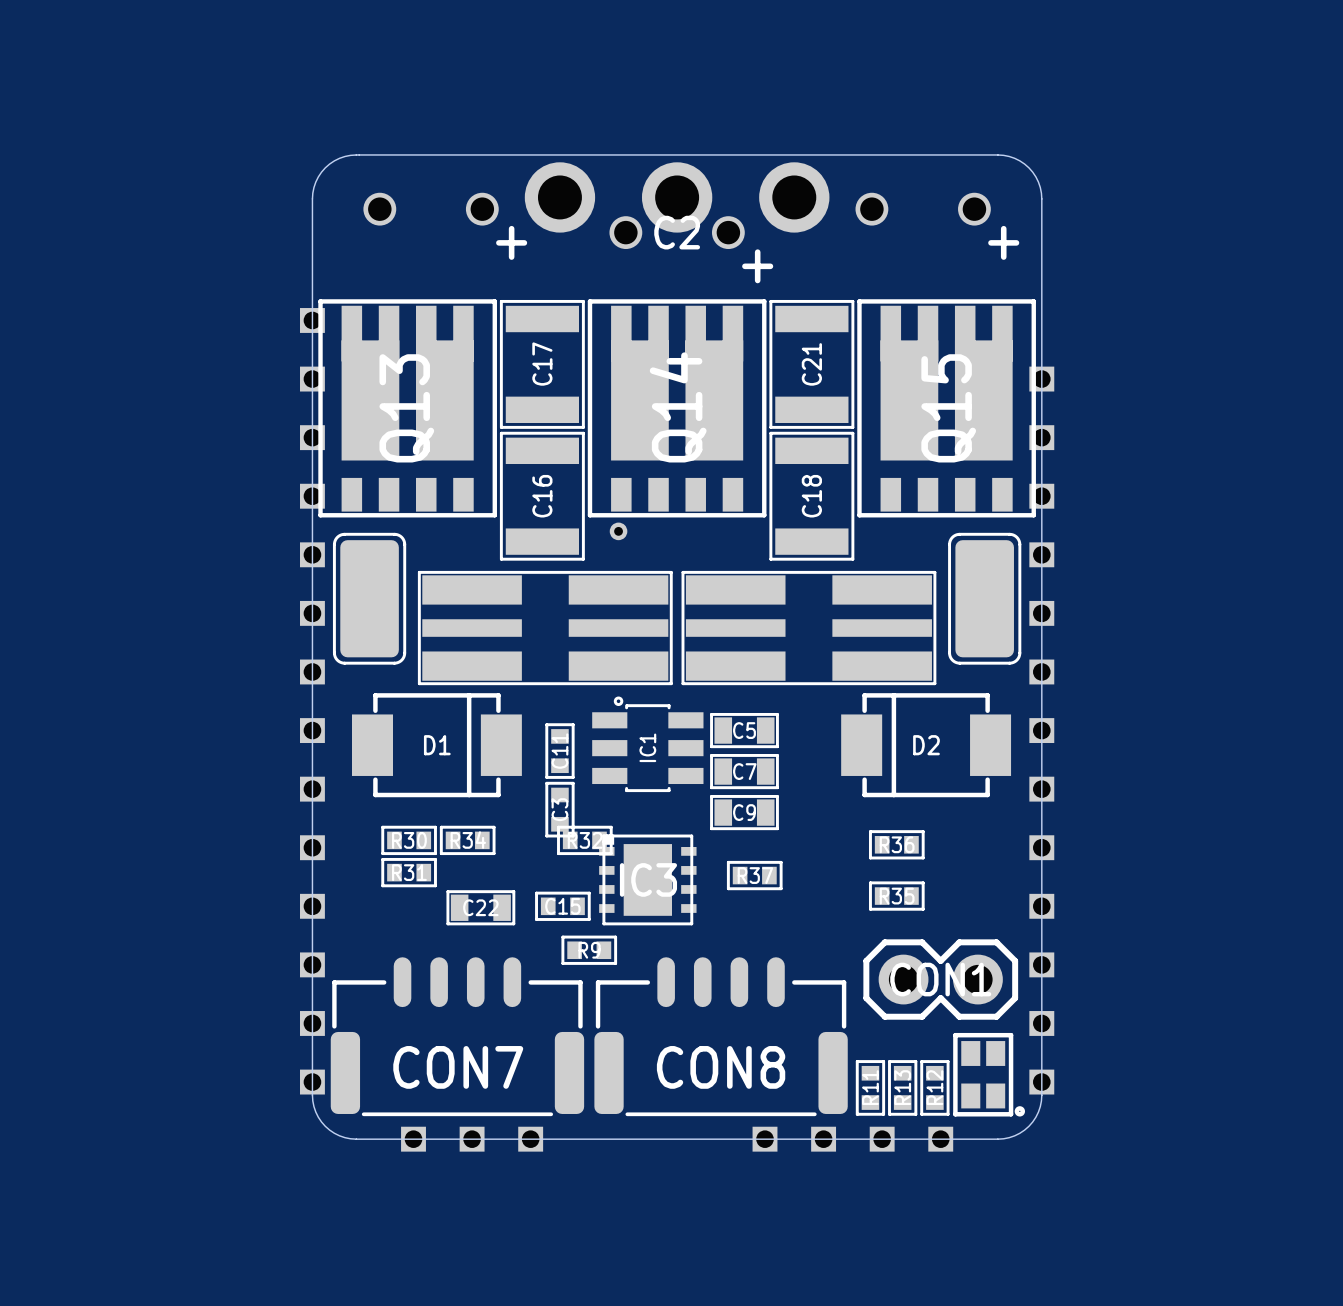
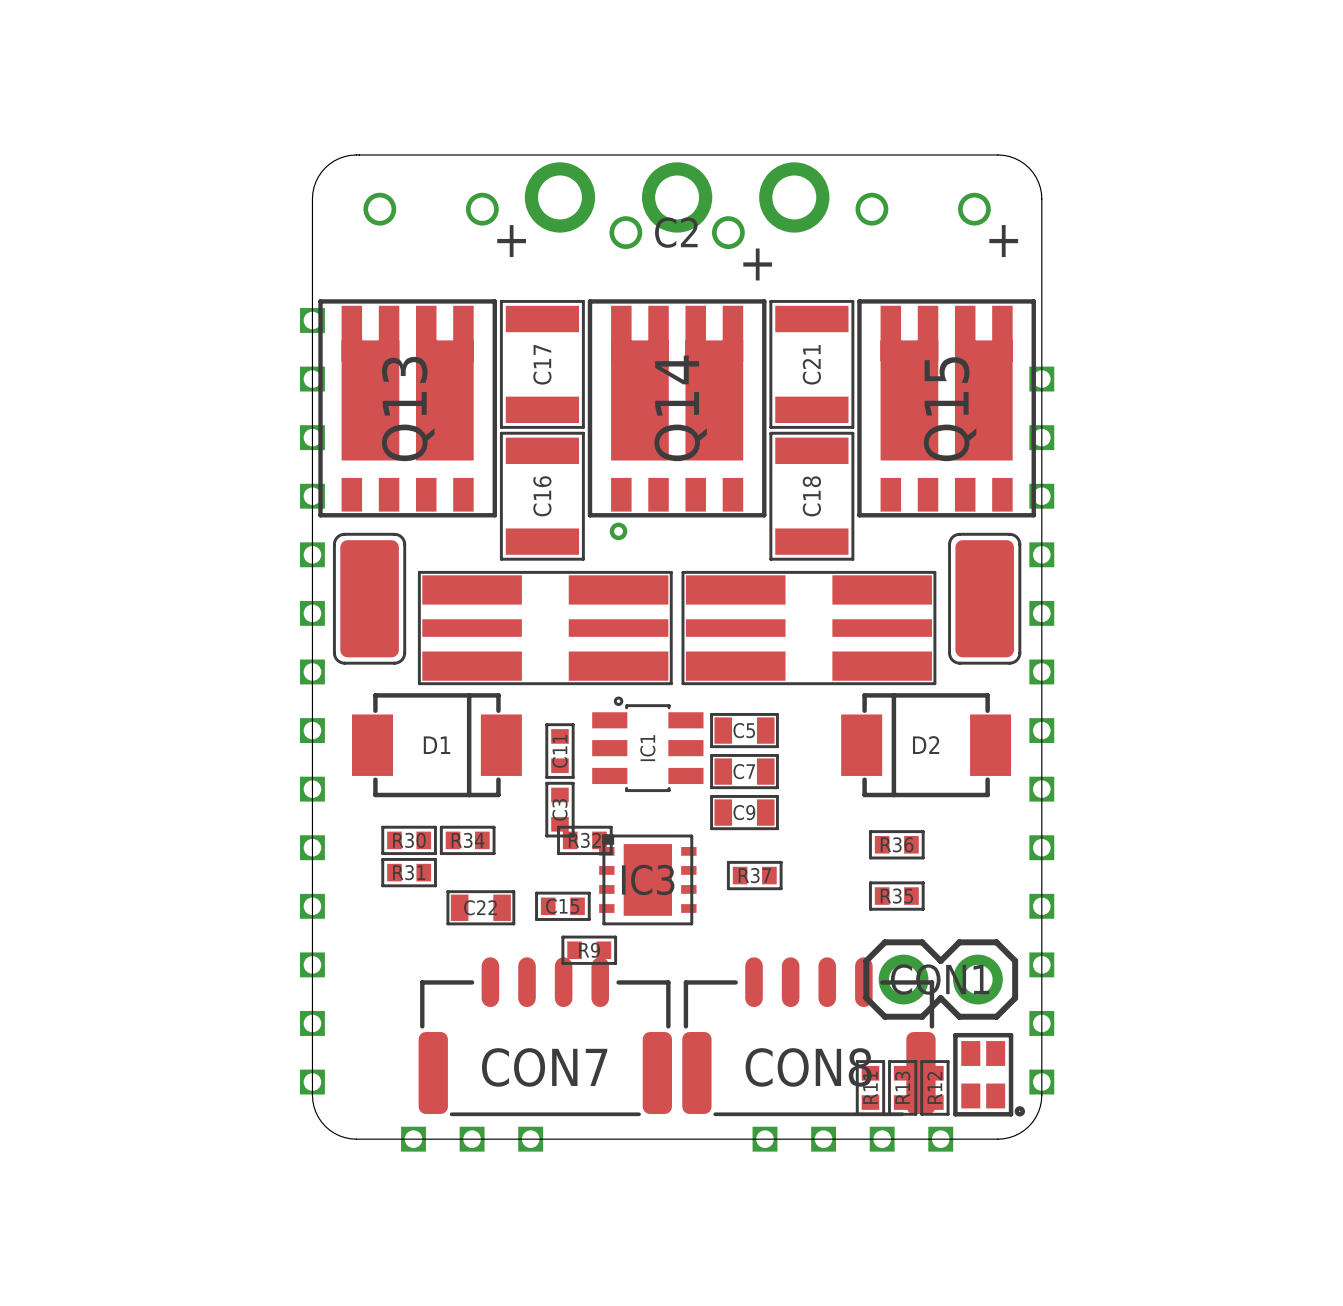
CON7 position: (457, 1036) -> (545, 1036)
CON8 position: (721, 1036) -> (808, 1036)

